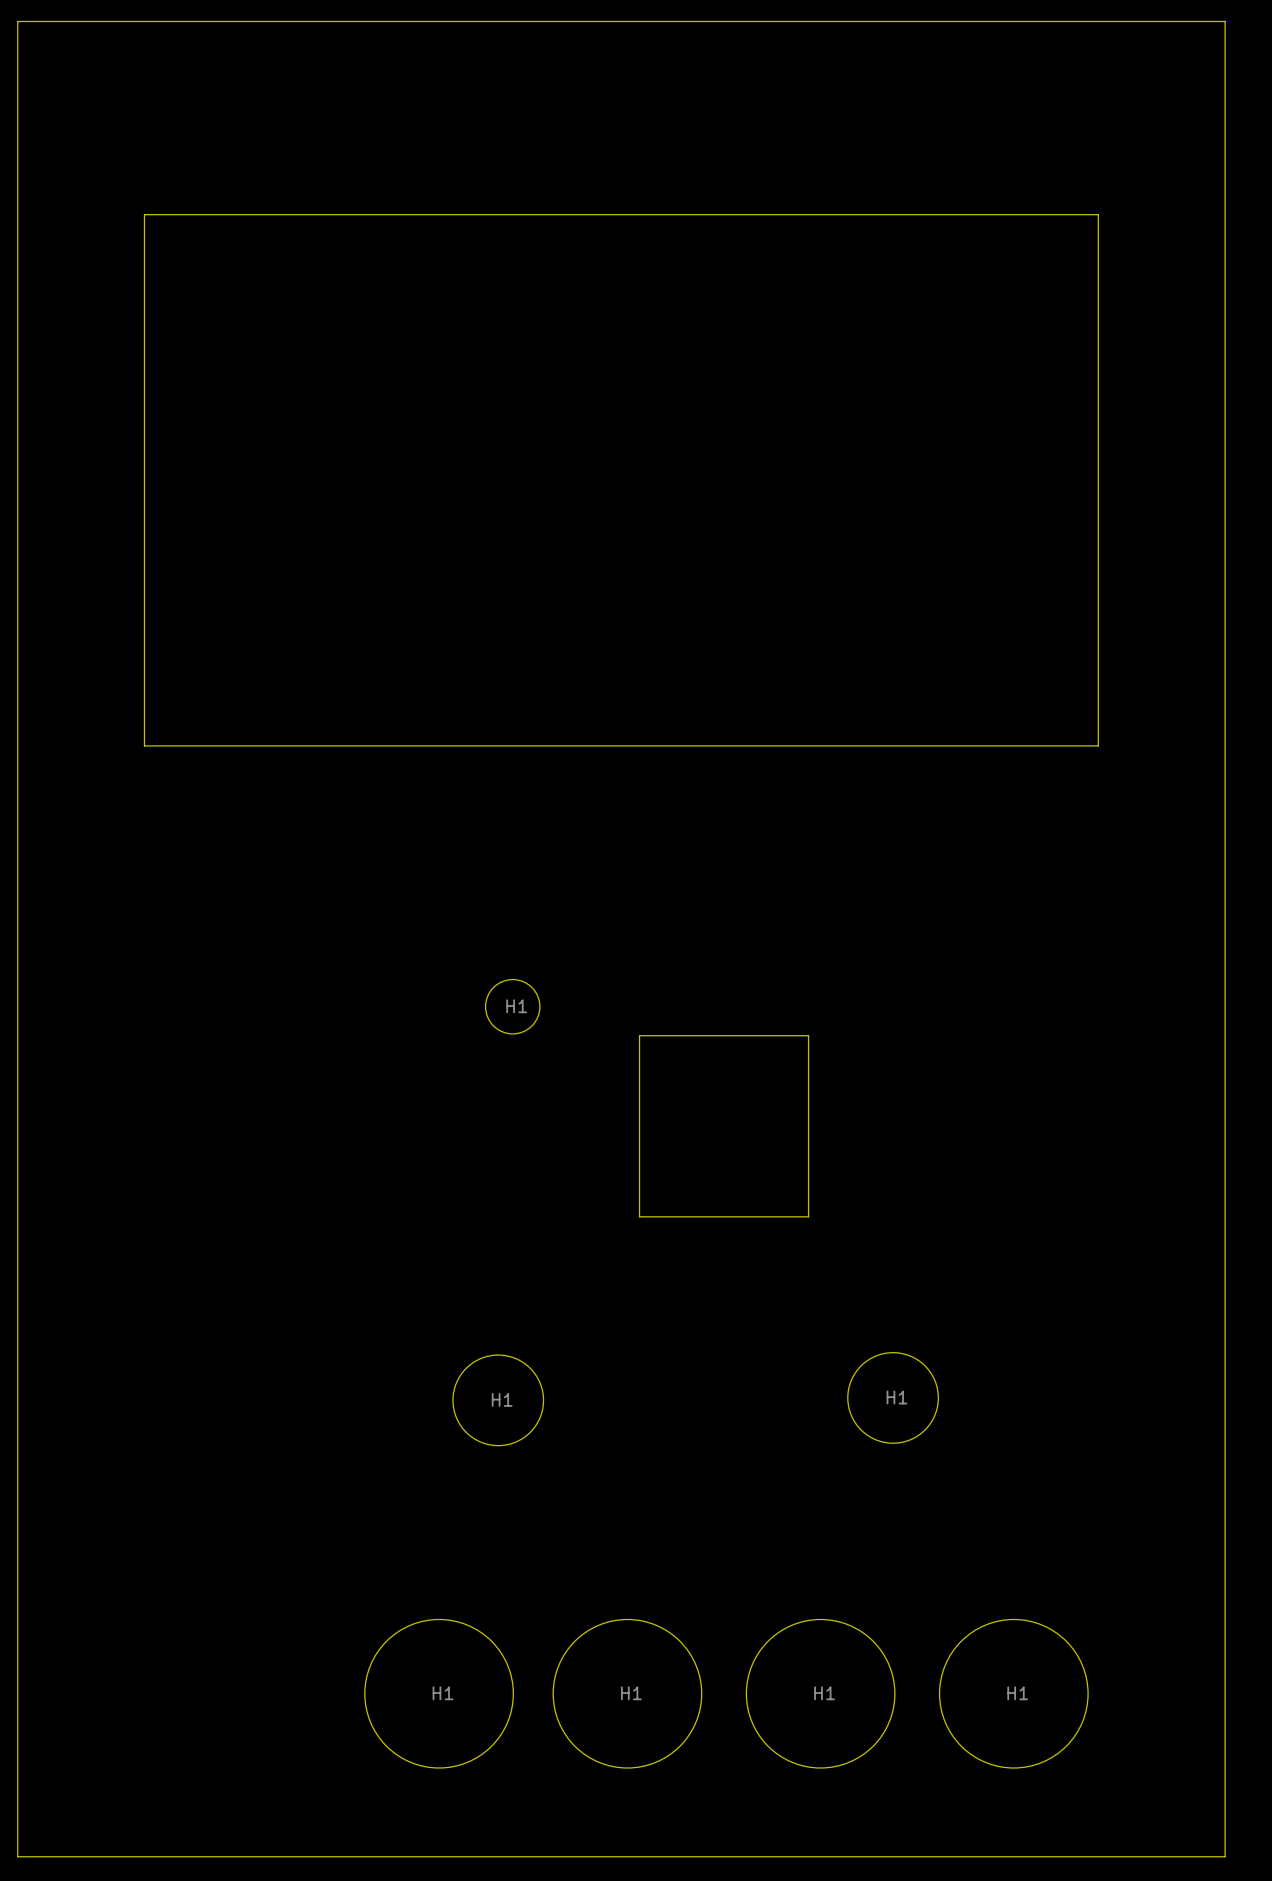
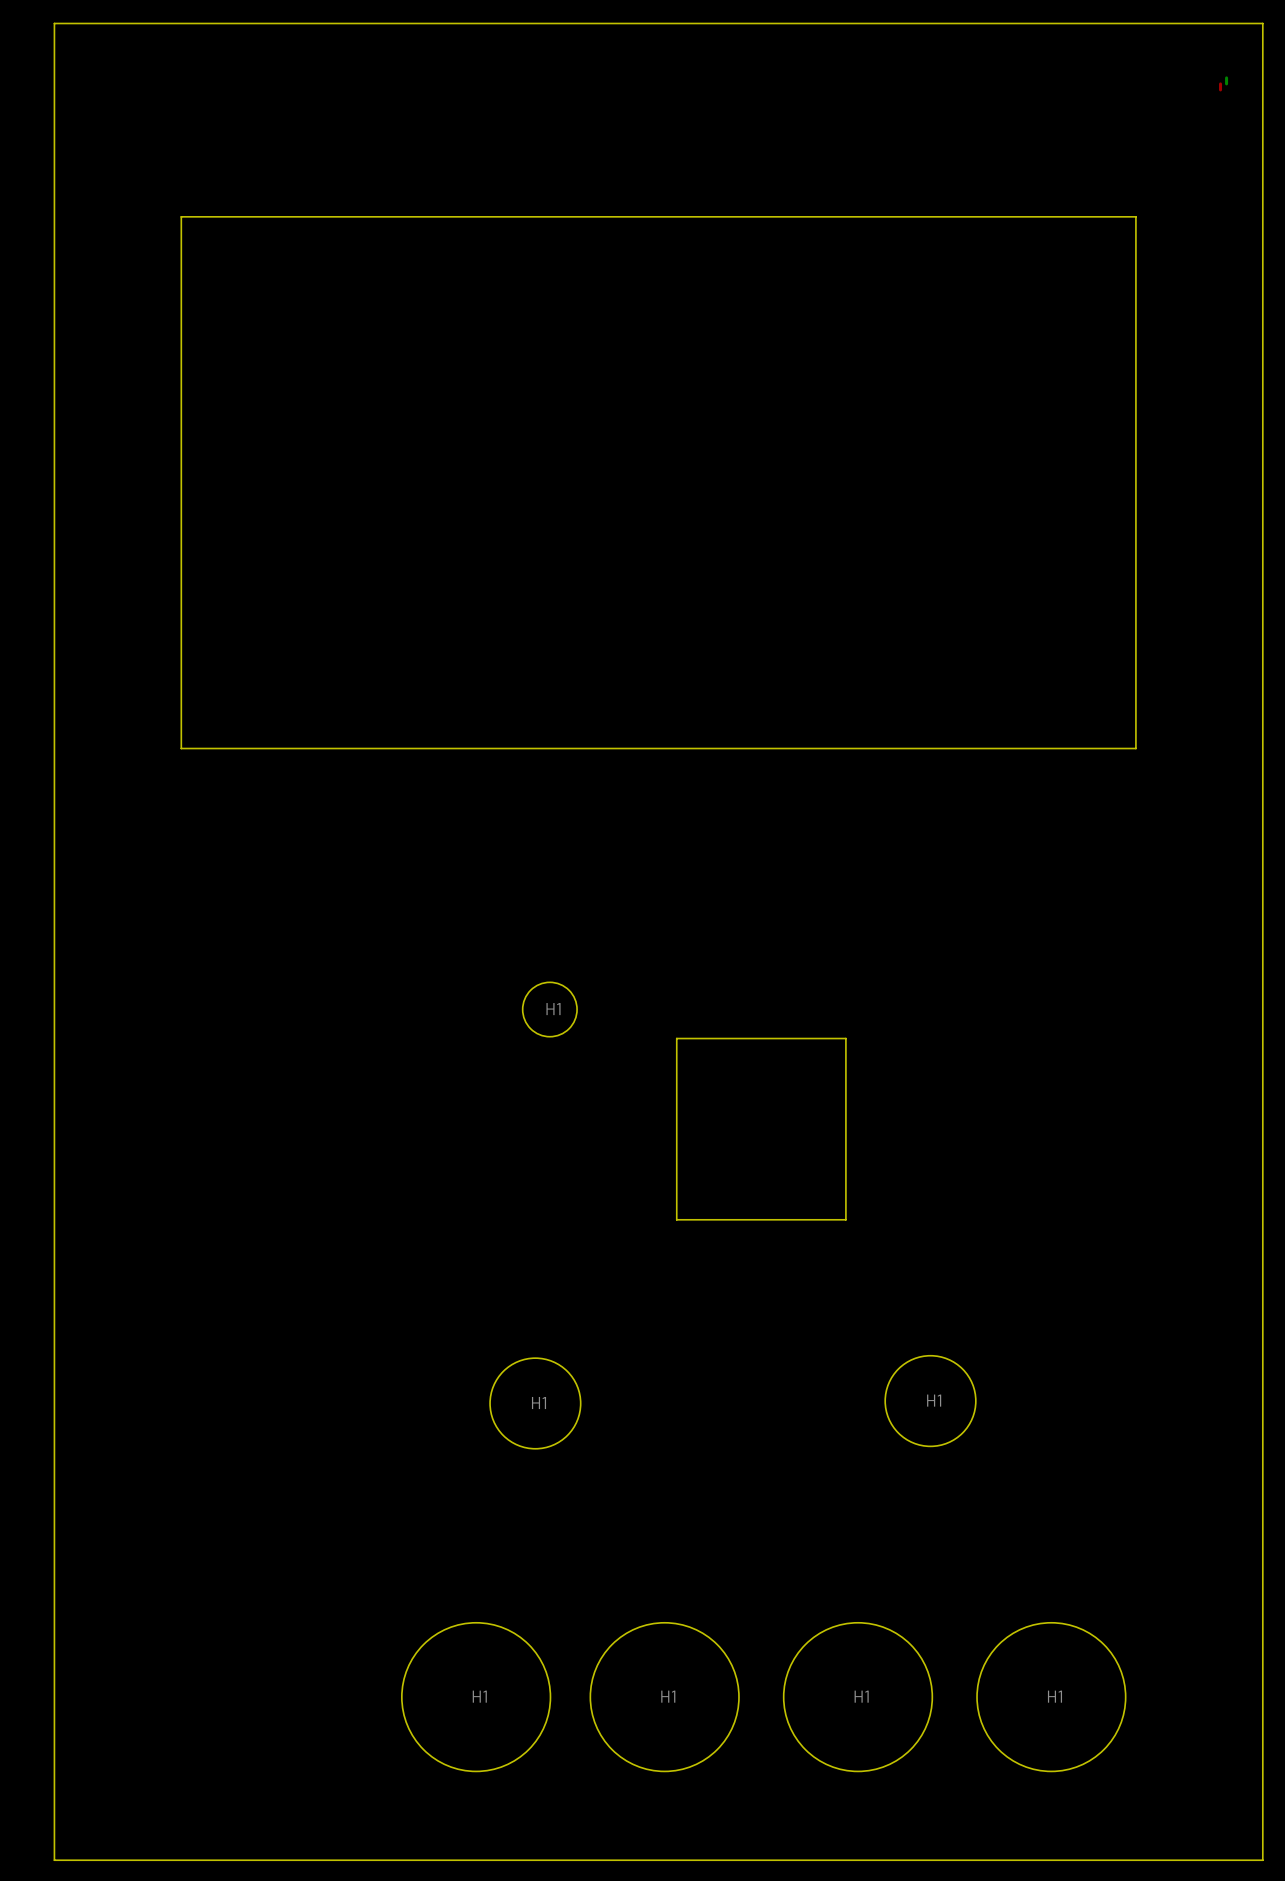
bottom track: none -> (1226, 77) (1226, 83)
top track: none -> (1220, 83) (1220, 89)

